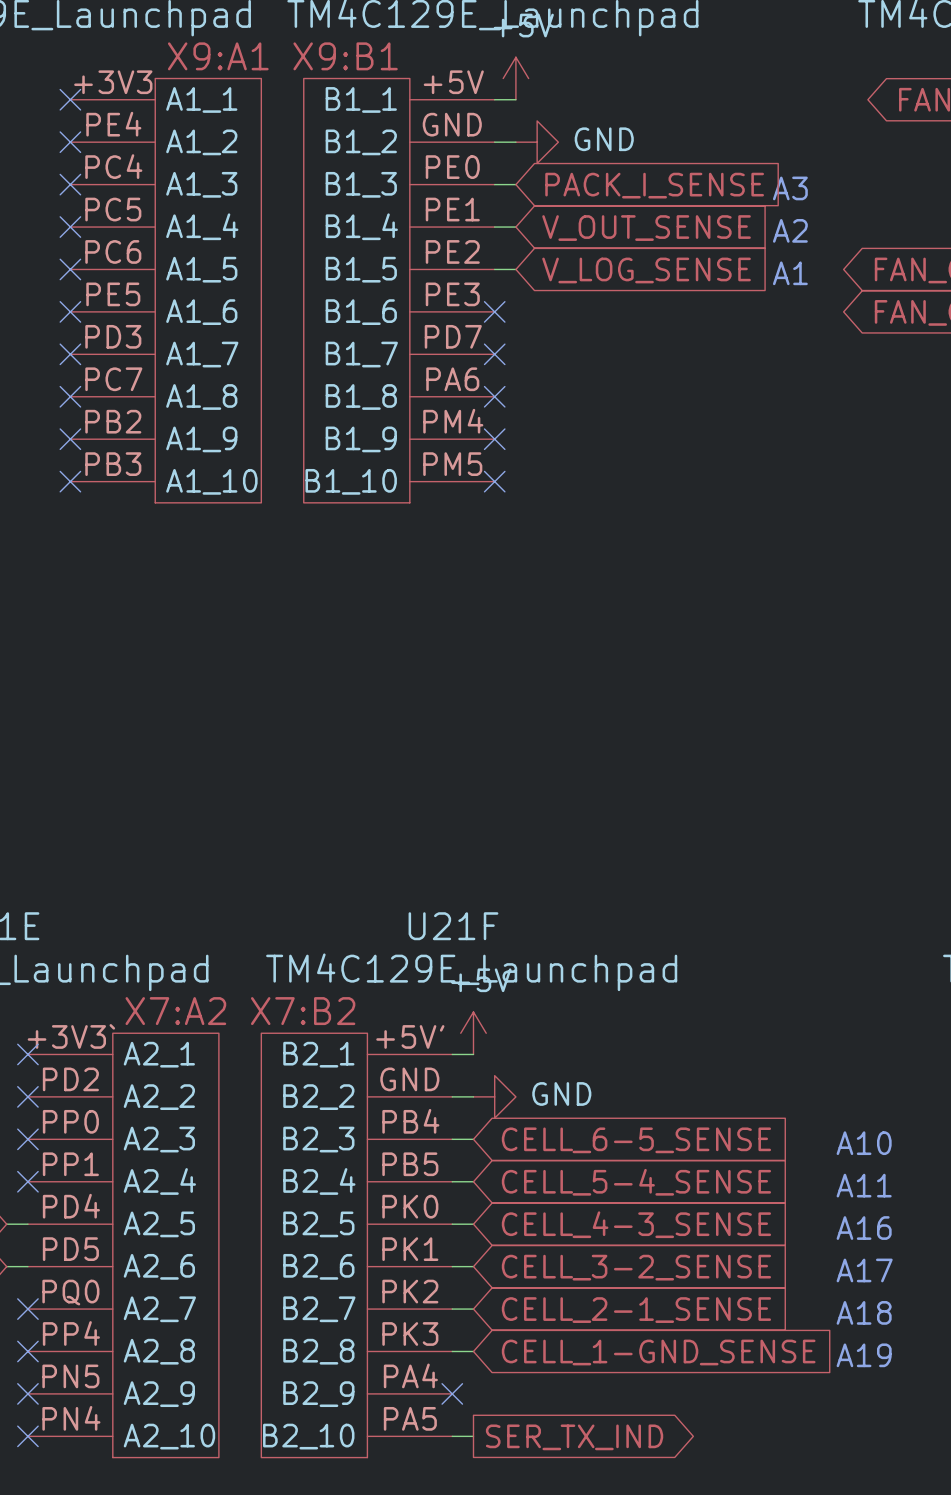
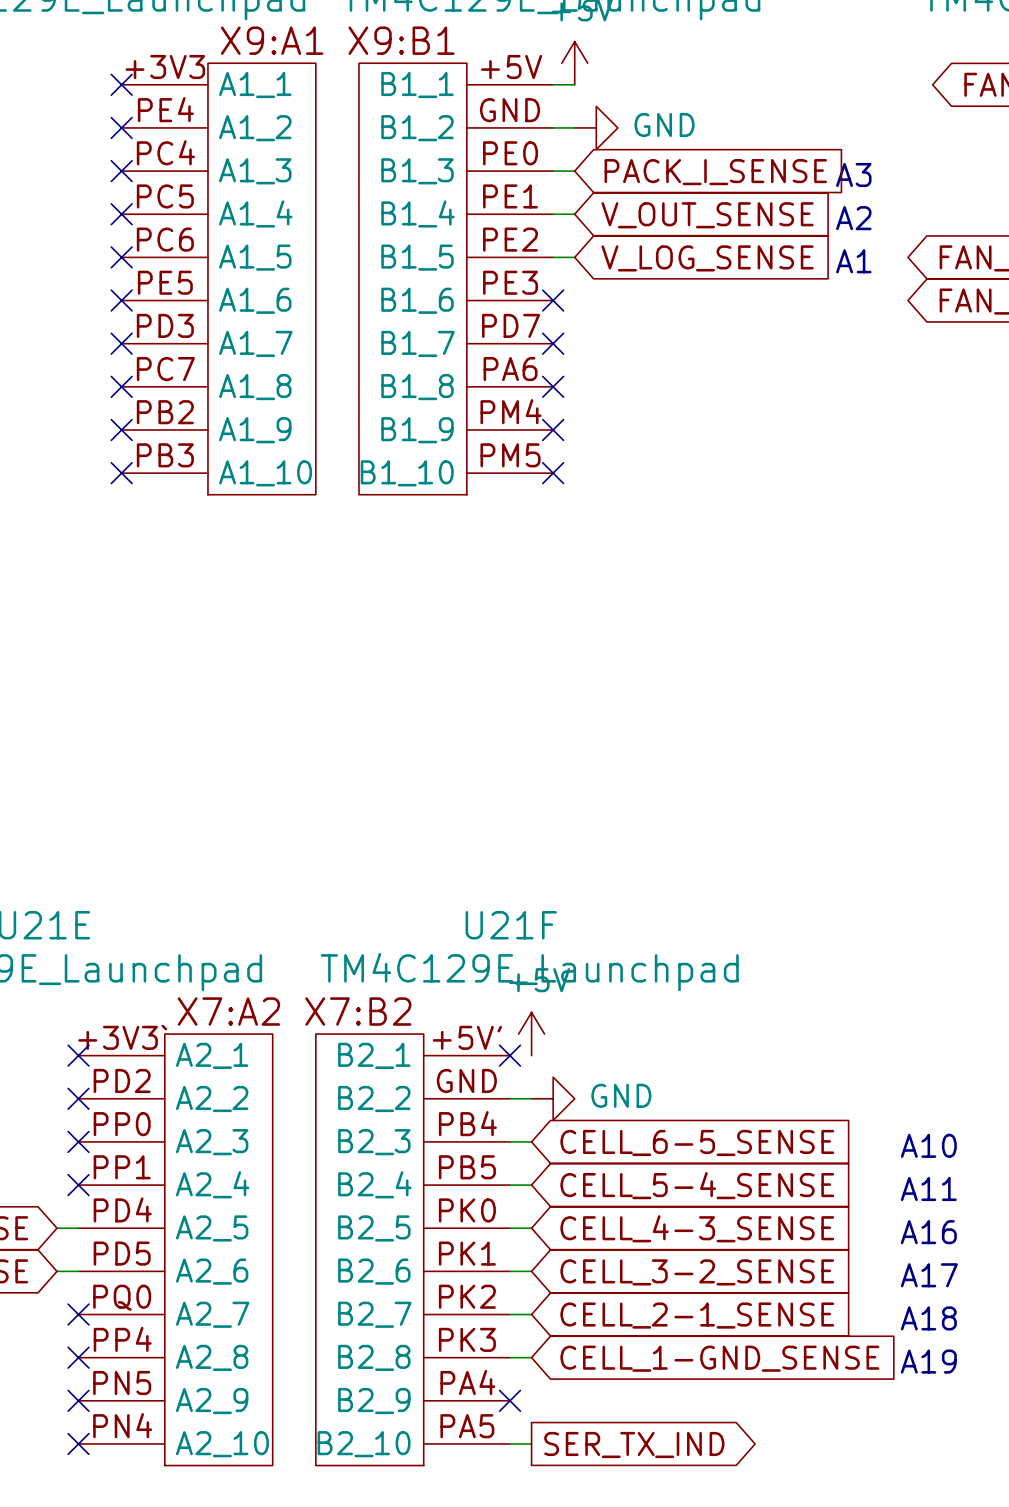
wire: (452, 1054) (473, 1054) -> none
no-connect mark: none -> (510, 1055)

